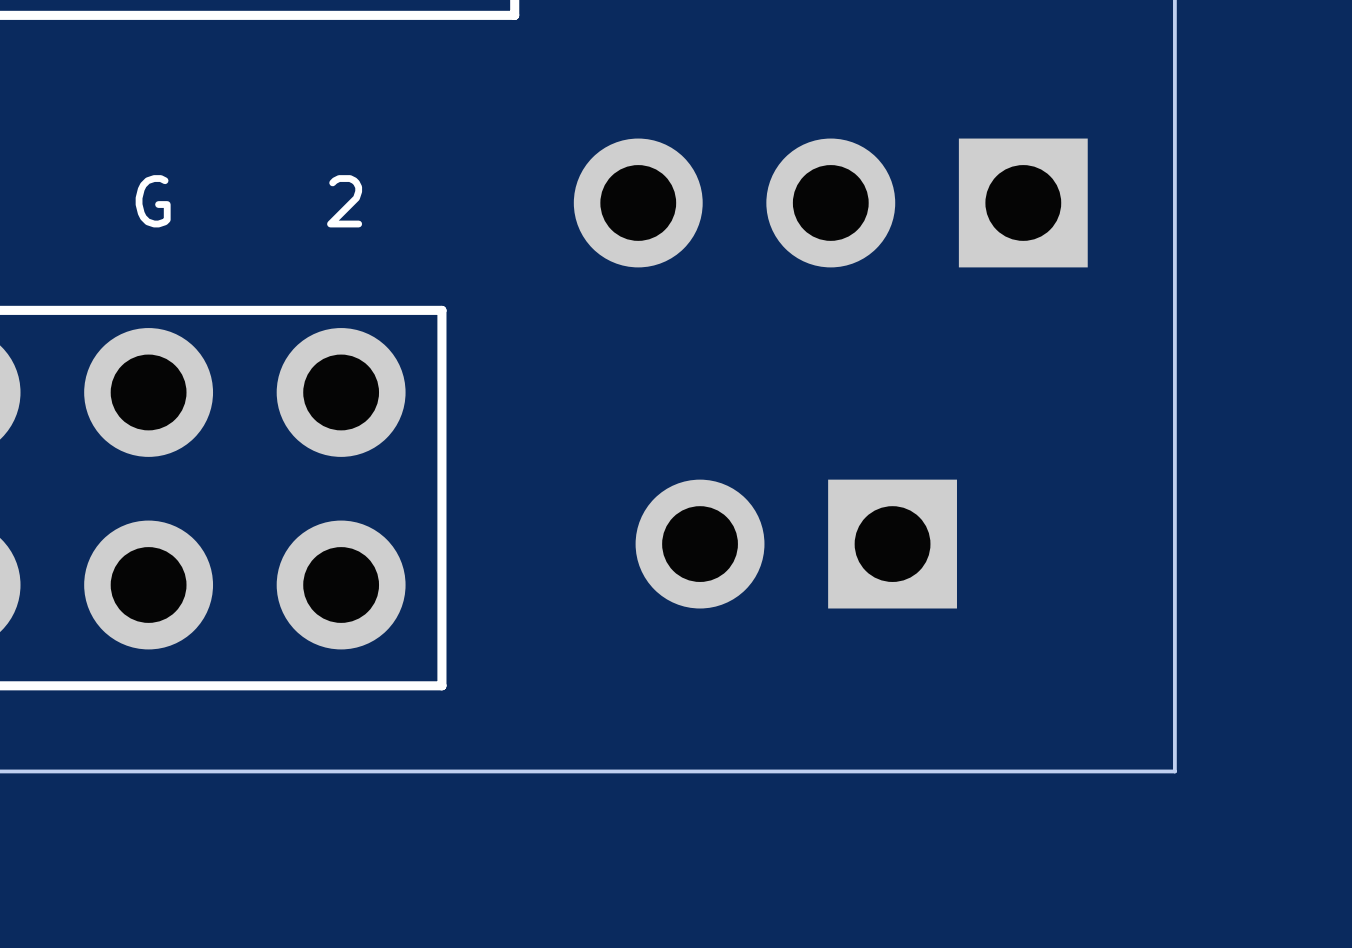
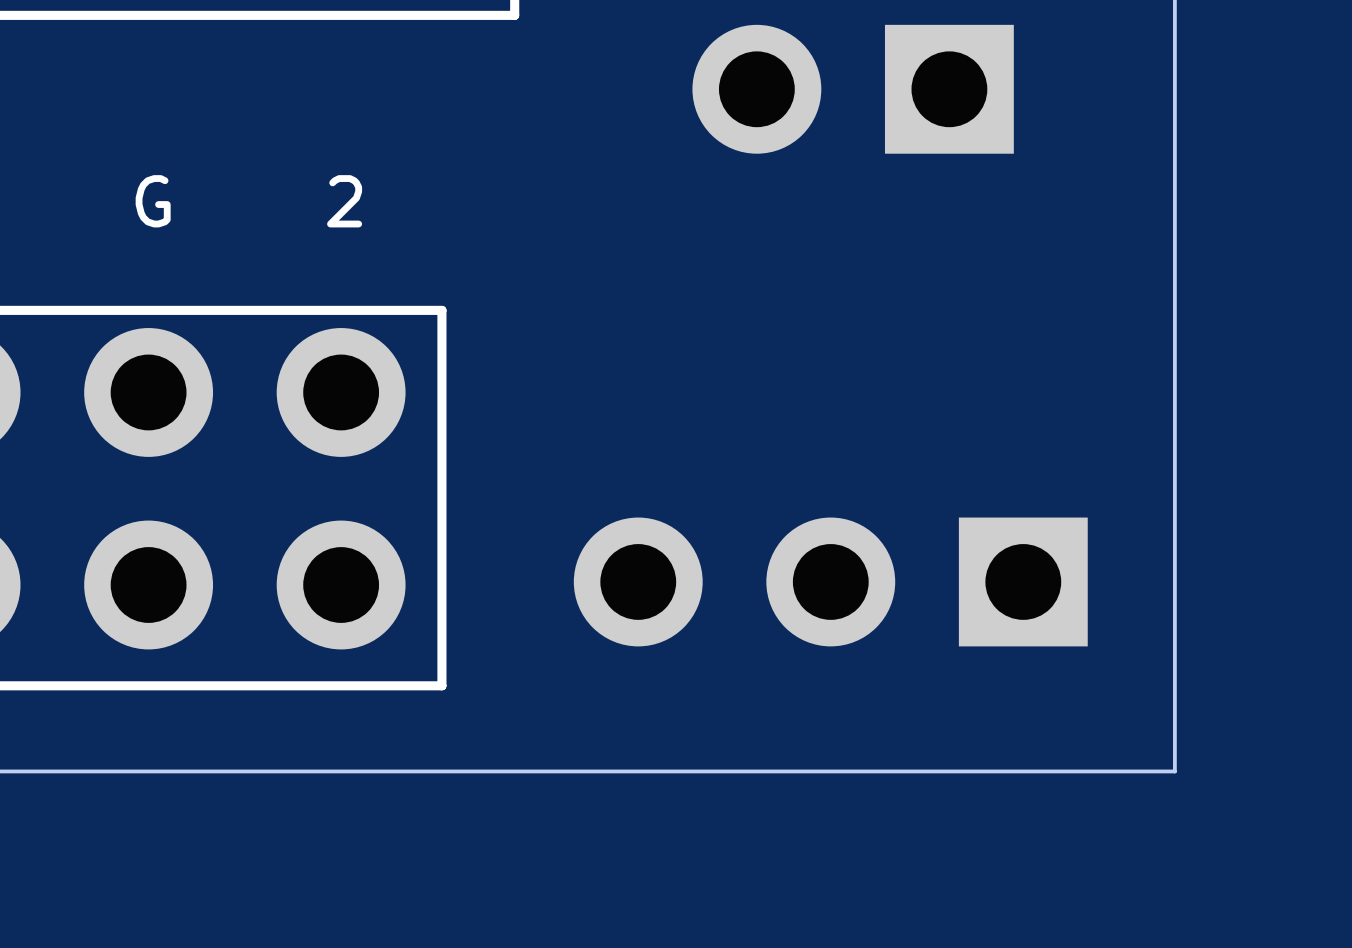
part: none -> (853, 89)
part: (830, 202) -> none
part footprint: [635, 479, 957, 609] -> [573, 517, 1088, 647]

